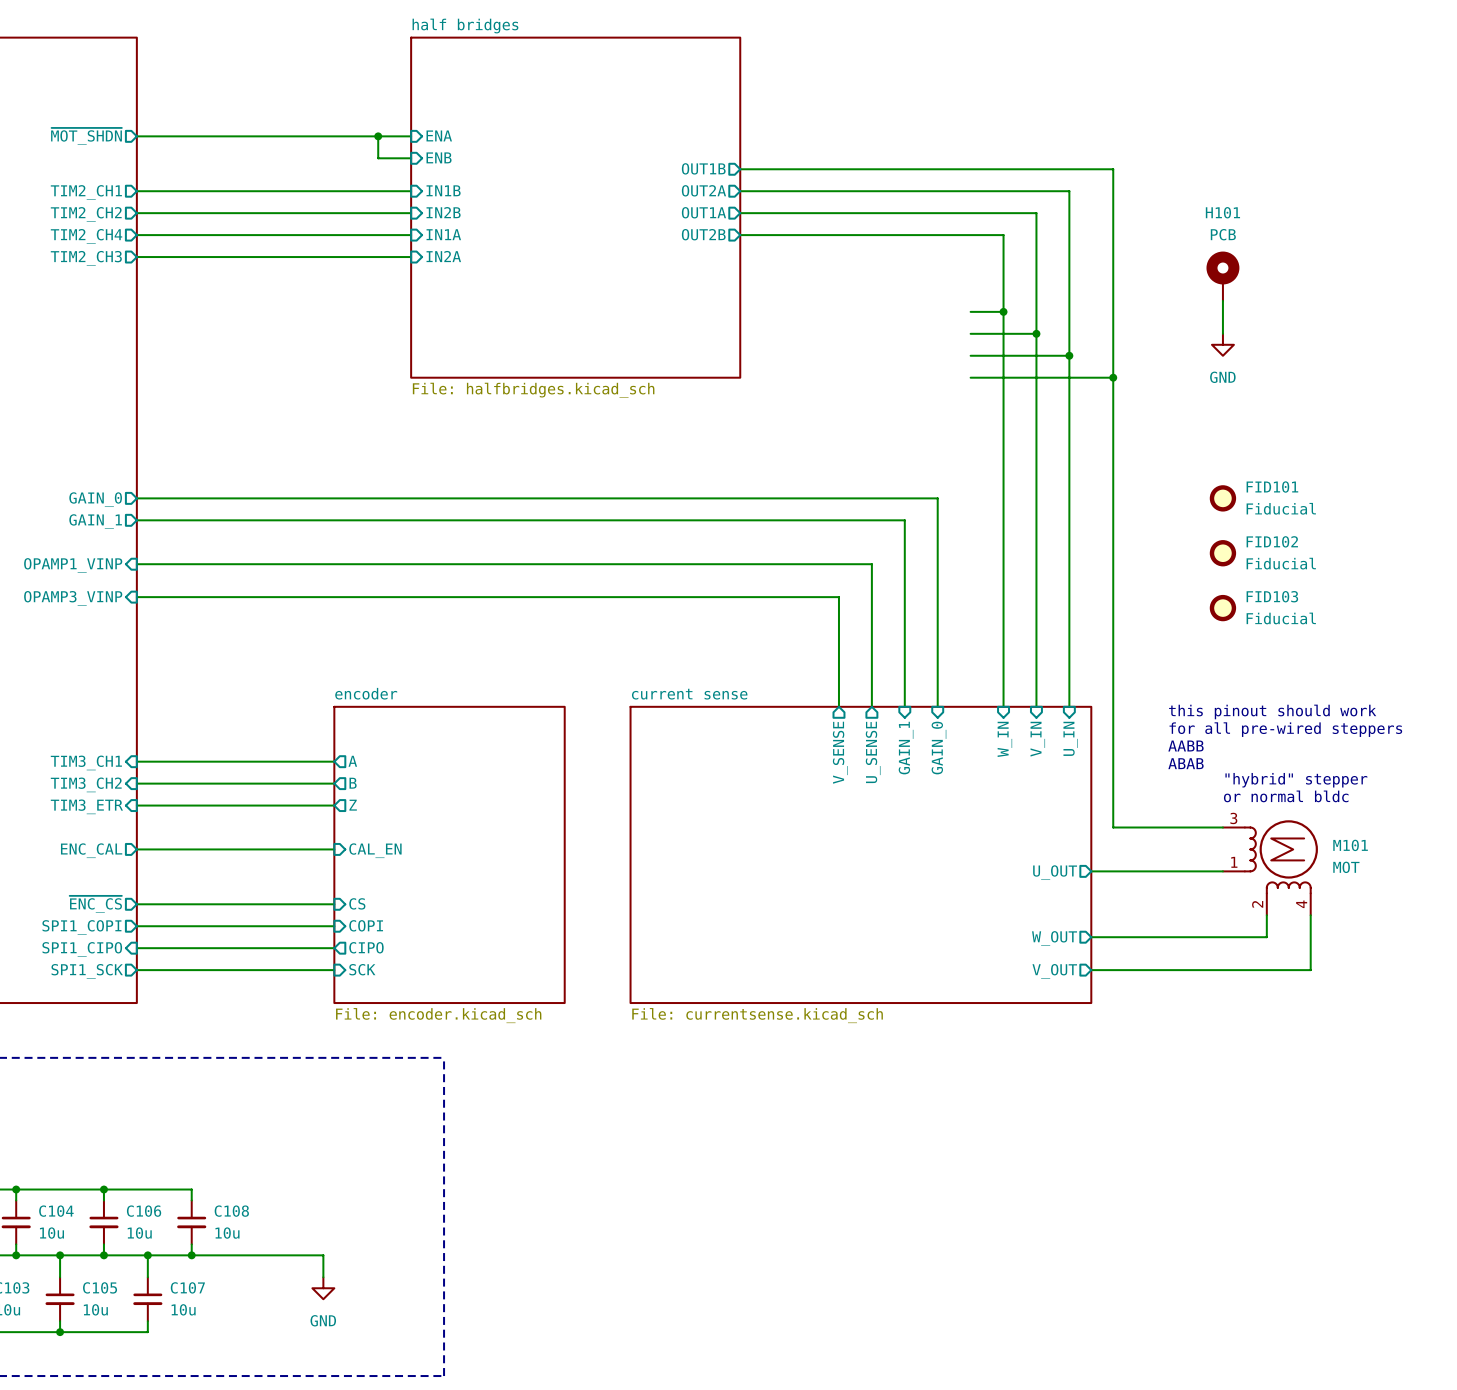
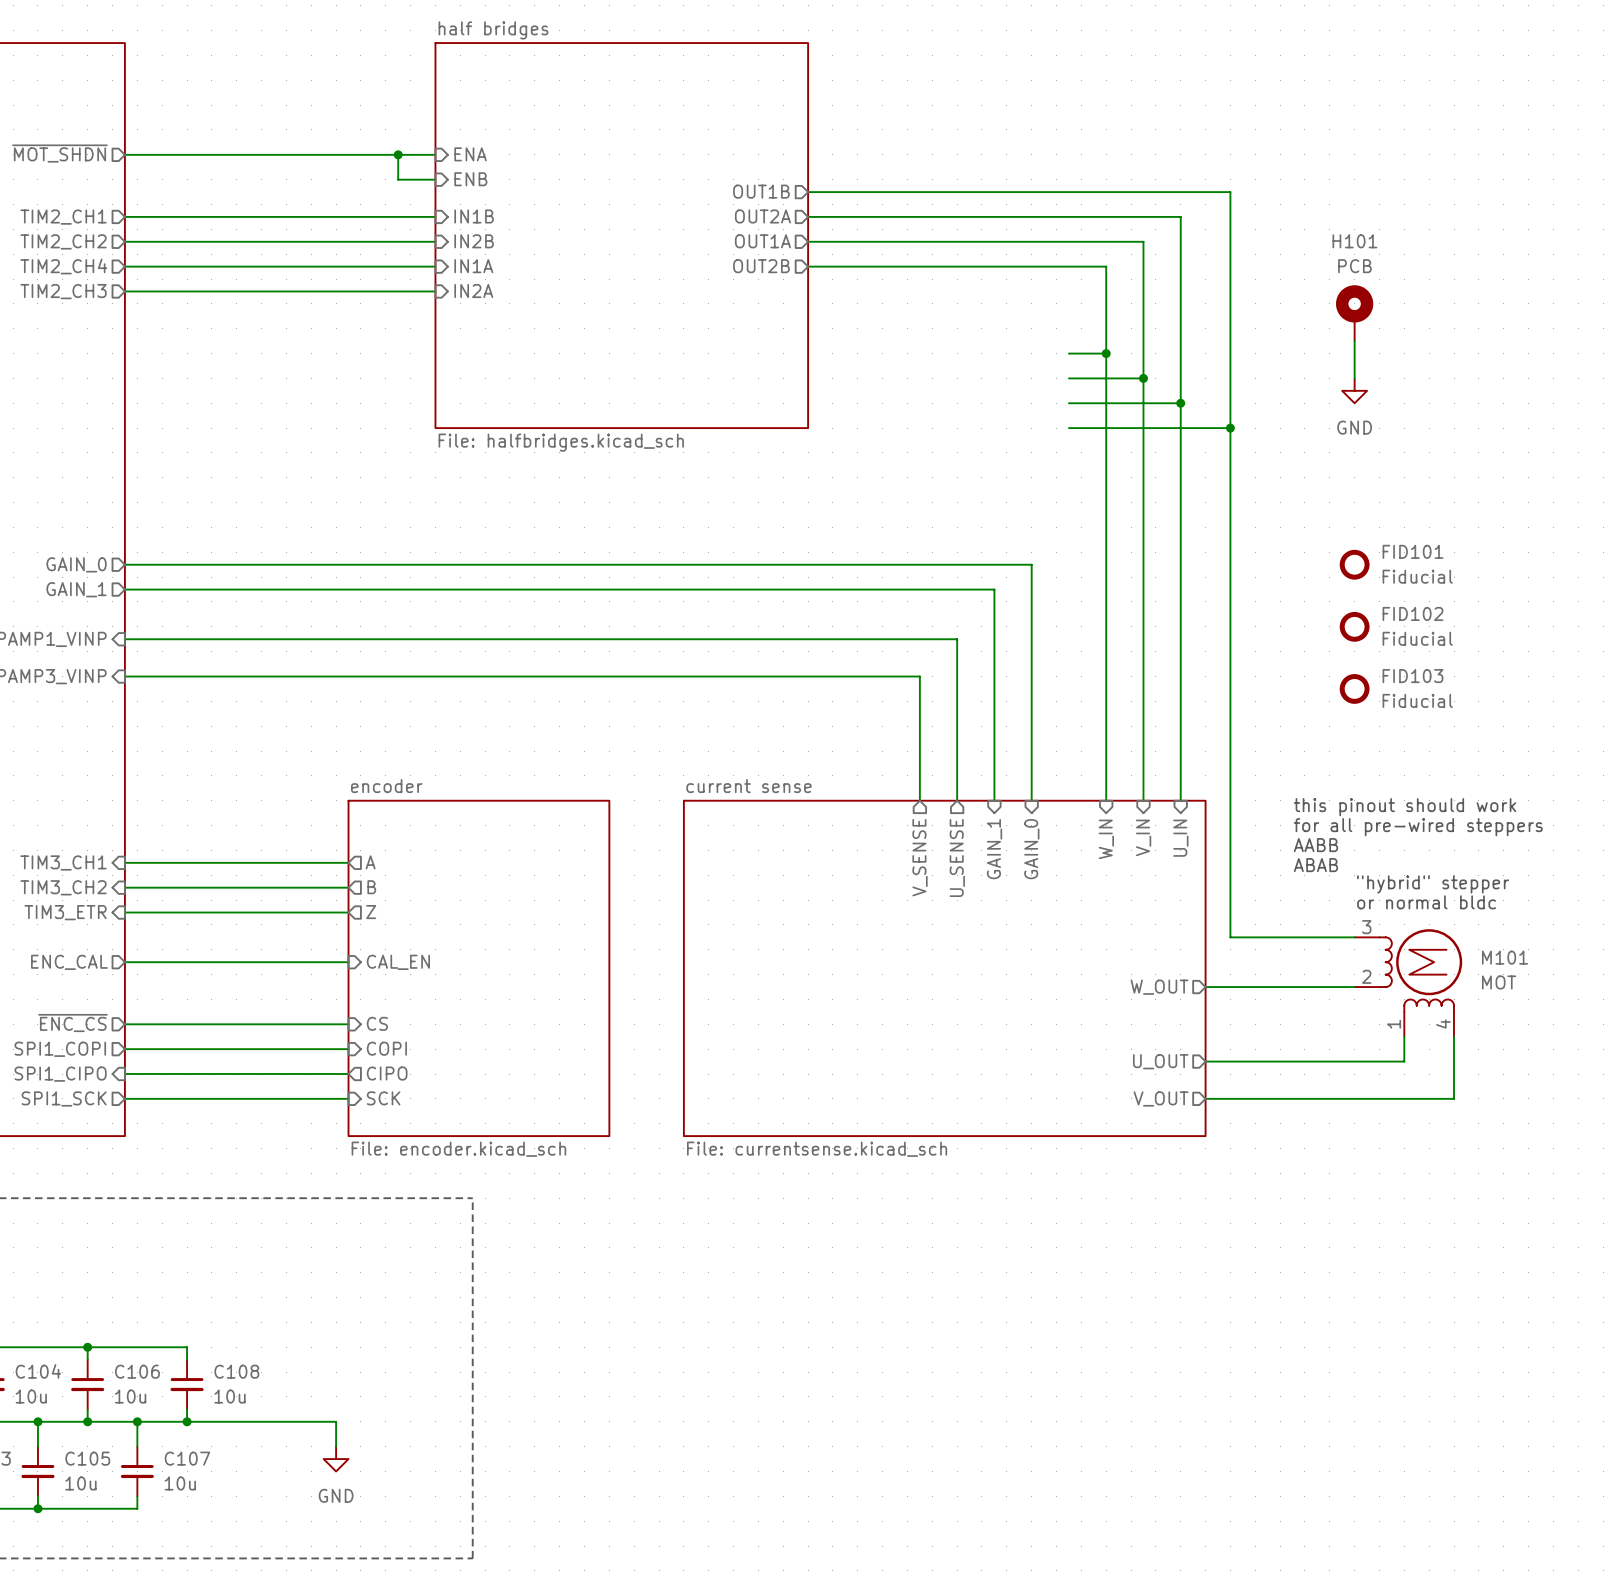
M101 pin number: 1 (1234, 862) -> 2 (1366, 976)
sheet pin: U_OUT (1055, 872) -> W_OUT (1159, 987)
M101 pin number: 2 (1257, 904) -> 1 (1394, 1024)
sheet pin: W_OUT (1054, 938) -> U_OUT (1160, 1061)

